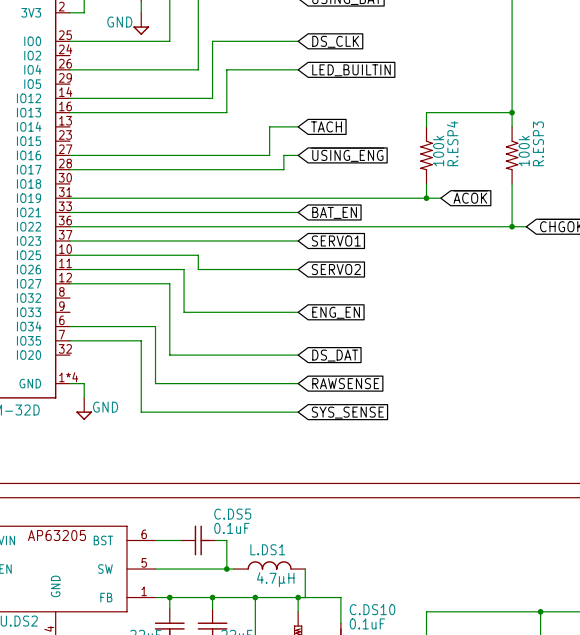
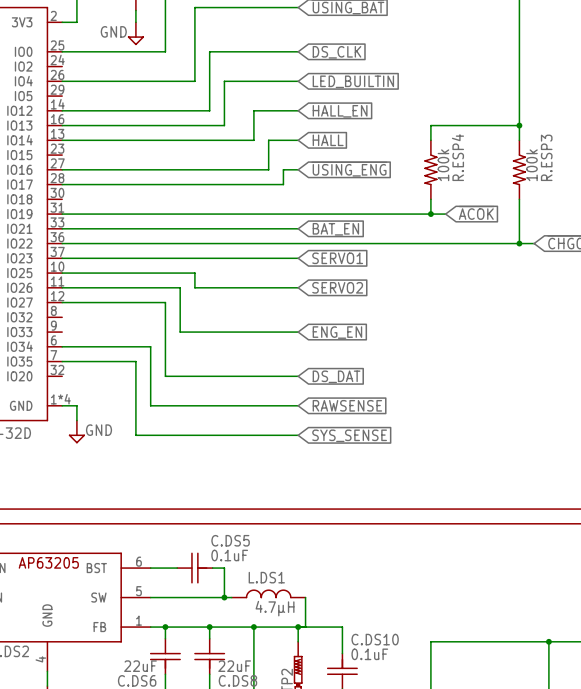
wire: none -> (298, 110) (253, 110) (253, 140) (62, 140)
global label: none -> HALL_EN (340, 111)
global label: TACH (326, 126) -> HALL (328, 140)

